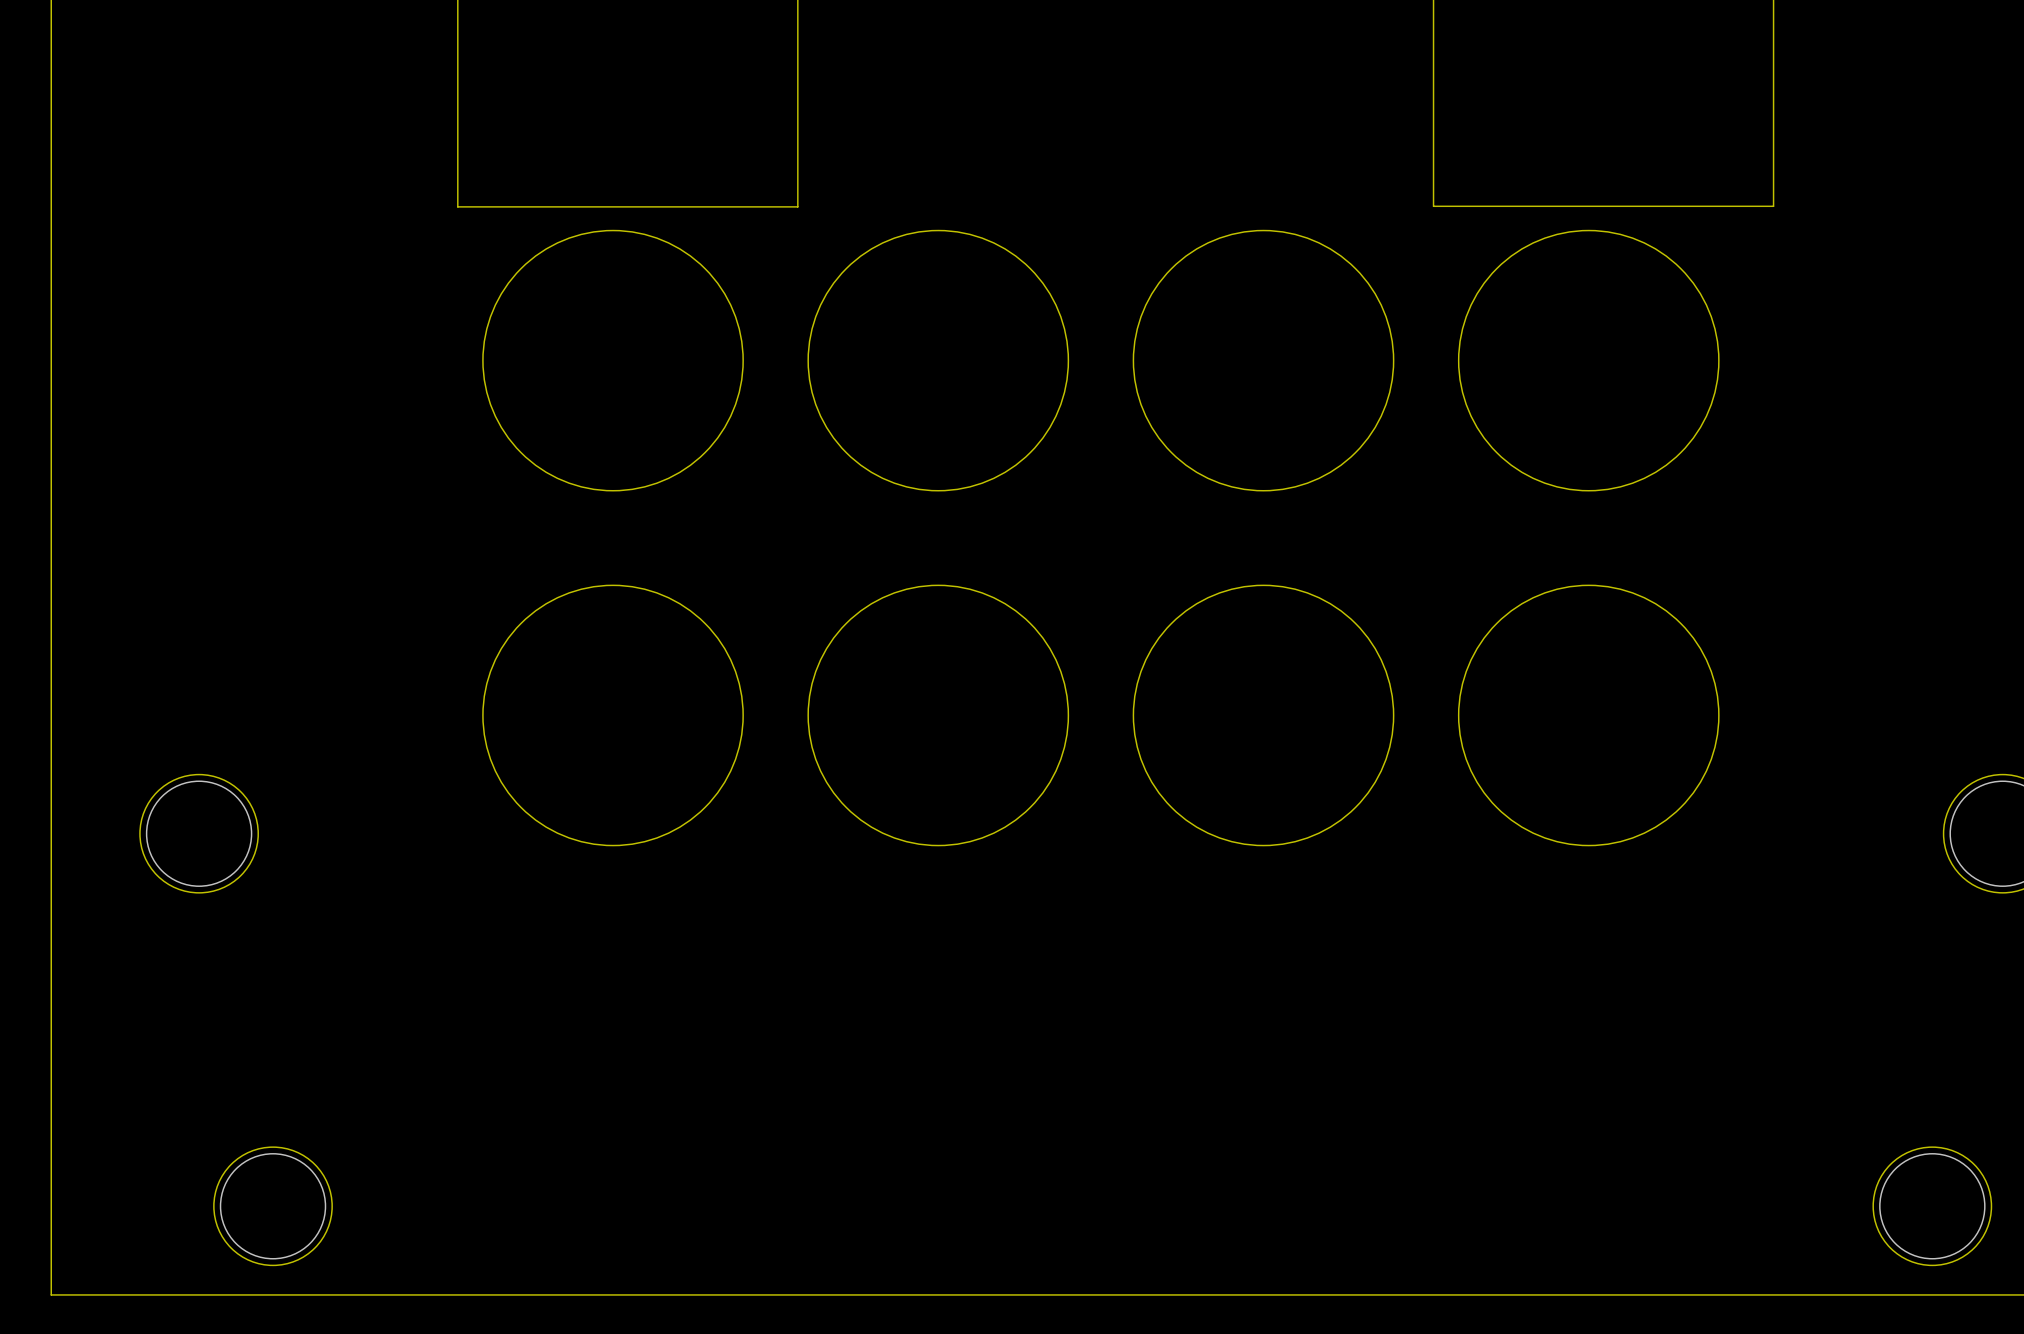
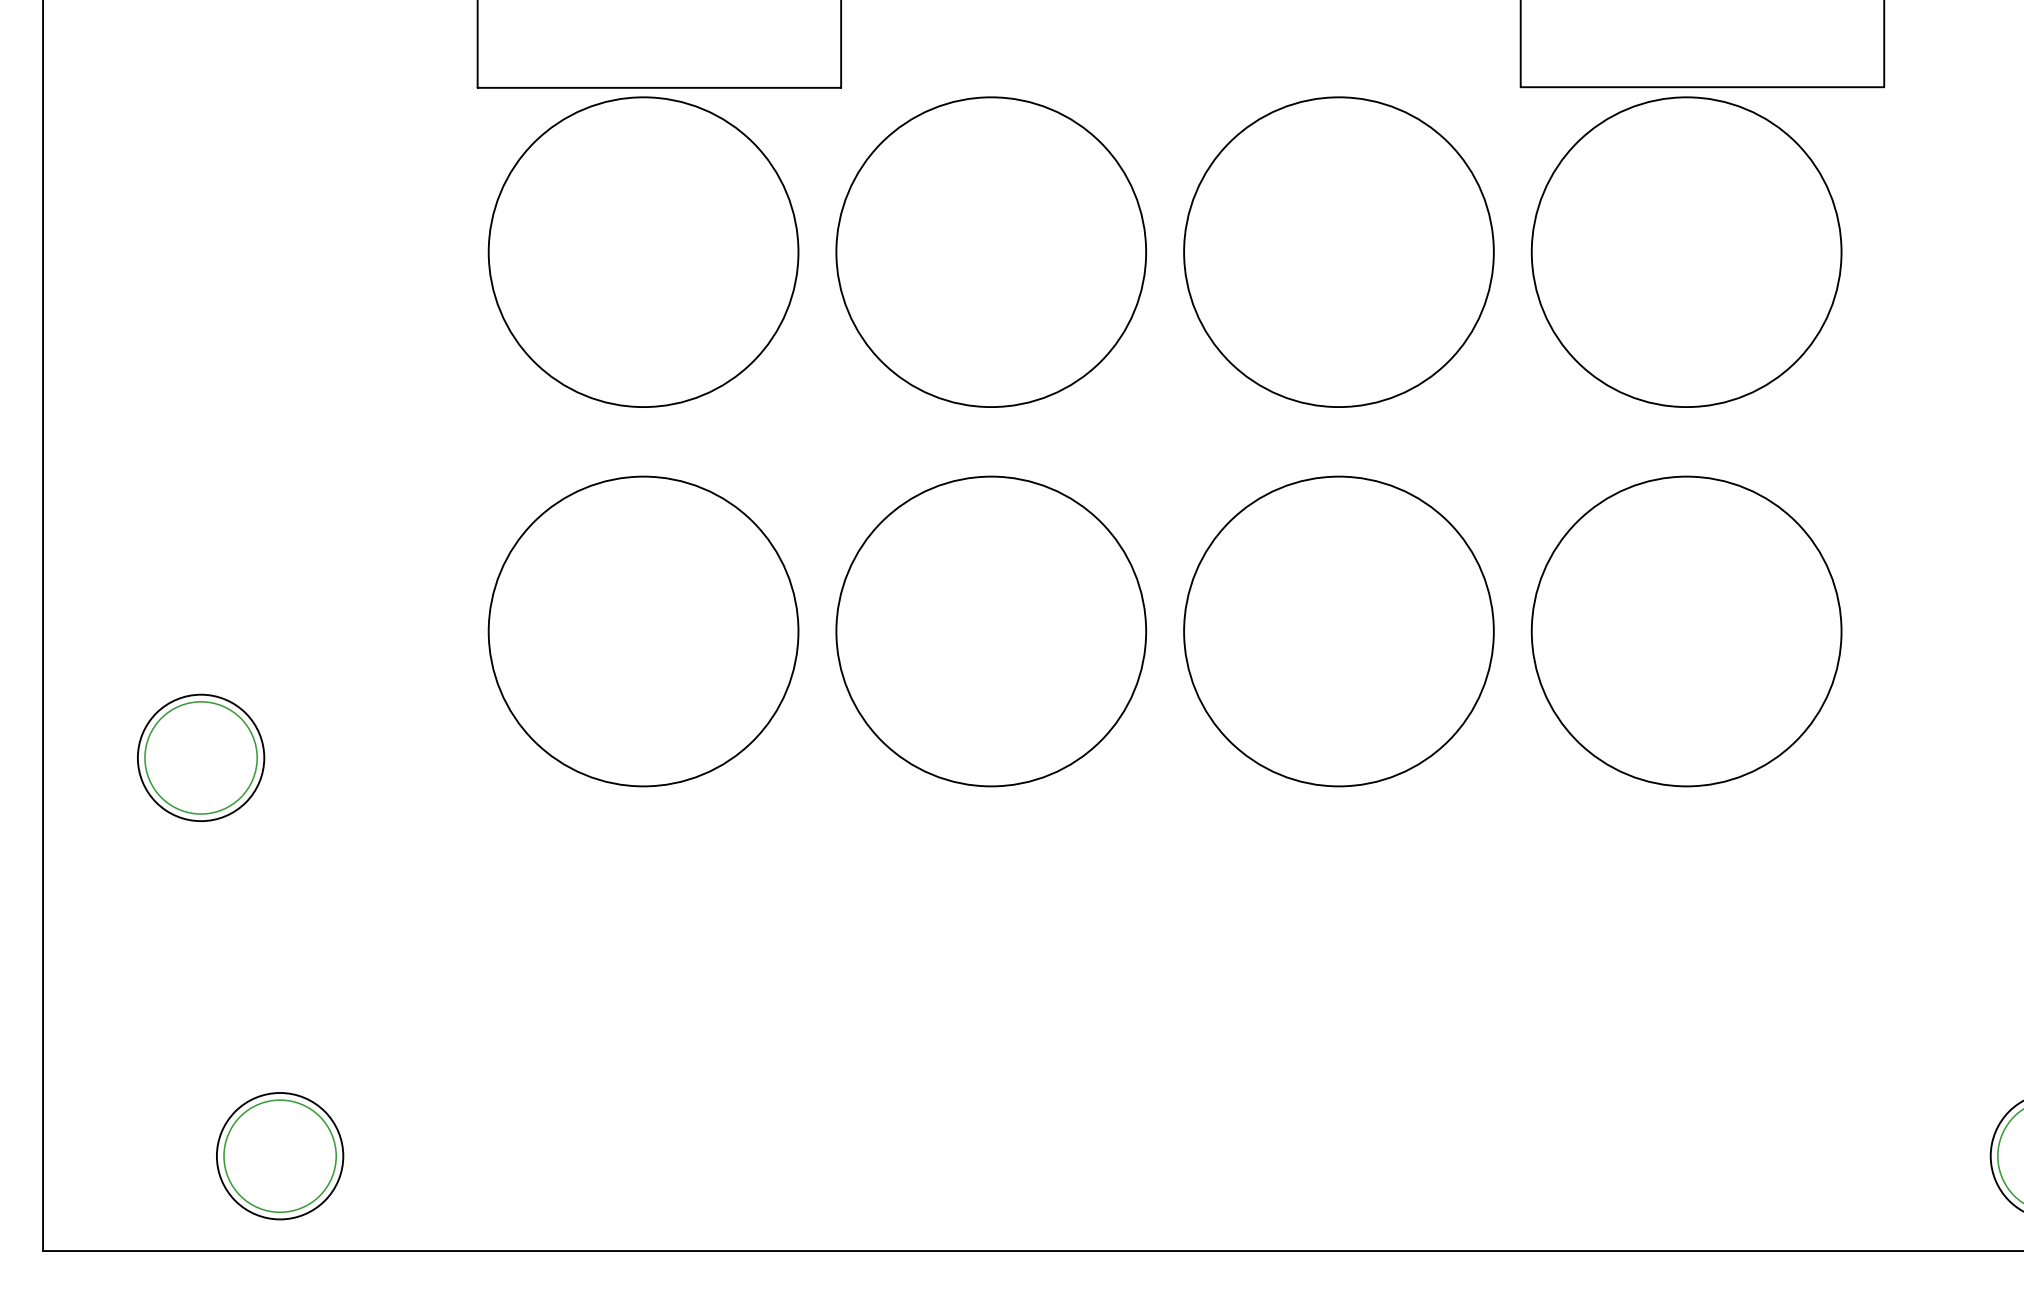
round board edge size: [482, 229, 744, 492] -> [487, 96, 800, 408]
round board edge size: [807, 229, 1070, 492] -> [835, 96, 1147, 408]
round board edge size: [1132, 229, 1395, 492] -> [1183, 96, 1495, 408]
round board edge size: [1457, 229, 1720, 492] -> [1531, 96, 1843, 408]
round board edge size: [482, 584, 744, 847] -> [487, 475, 800, 788]
round board edge size: [807, 584, 1070, 847] -> [835, 475, 1147, 788]
round board edge size: [1132, 584, 1395, 847] -> [1183, 475, 1495, 788]
round board edge size: [1457, 584, 1720, 847] -> [1531, 475, 1843, 788]

